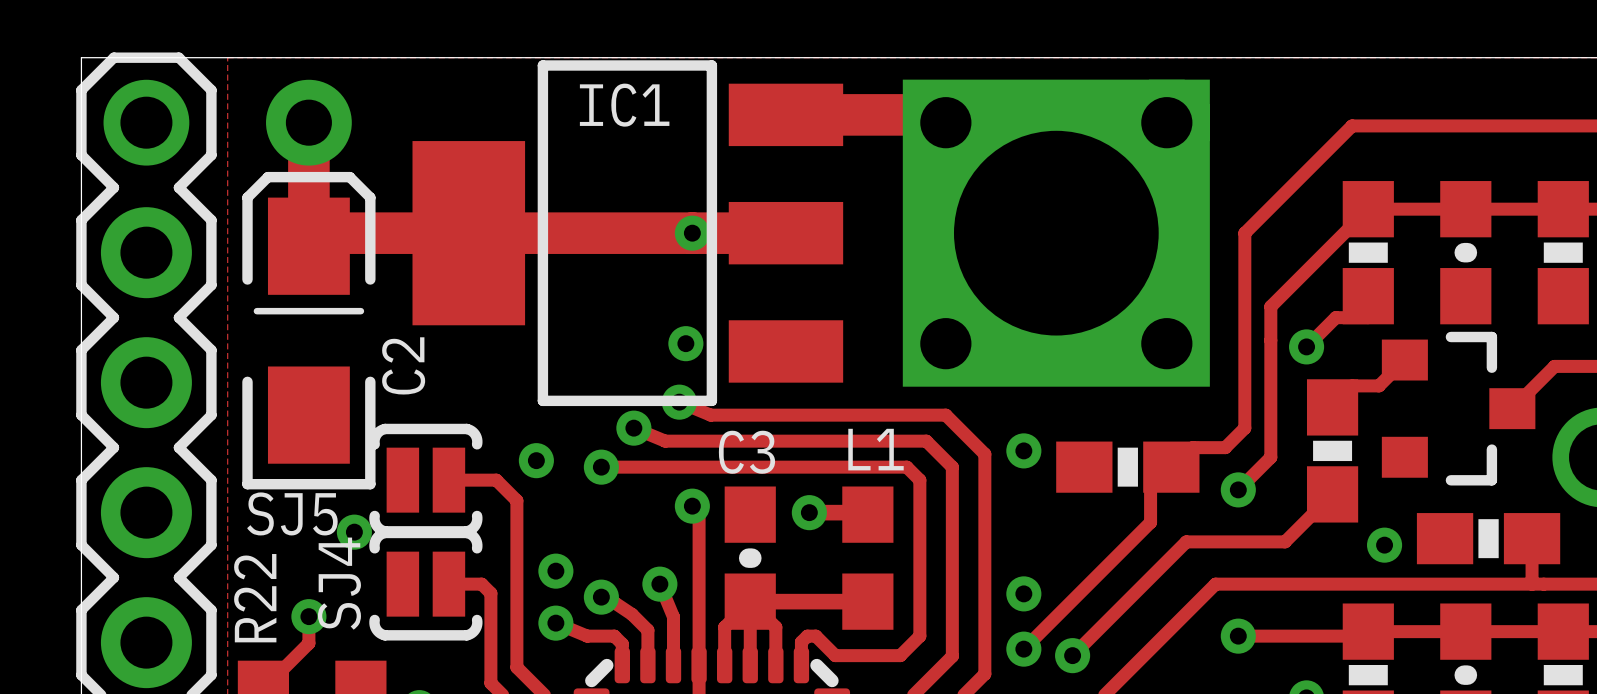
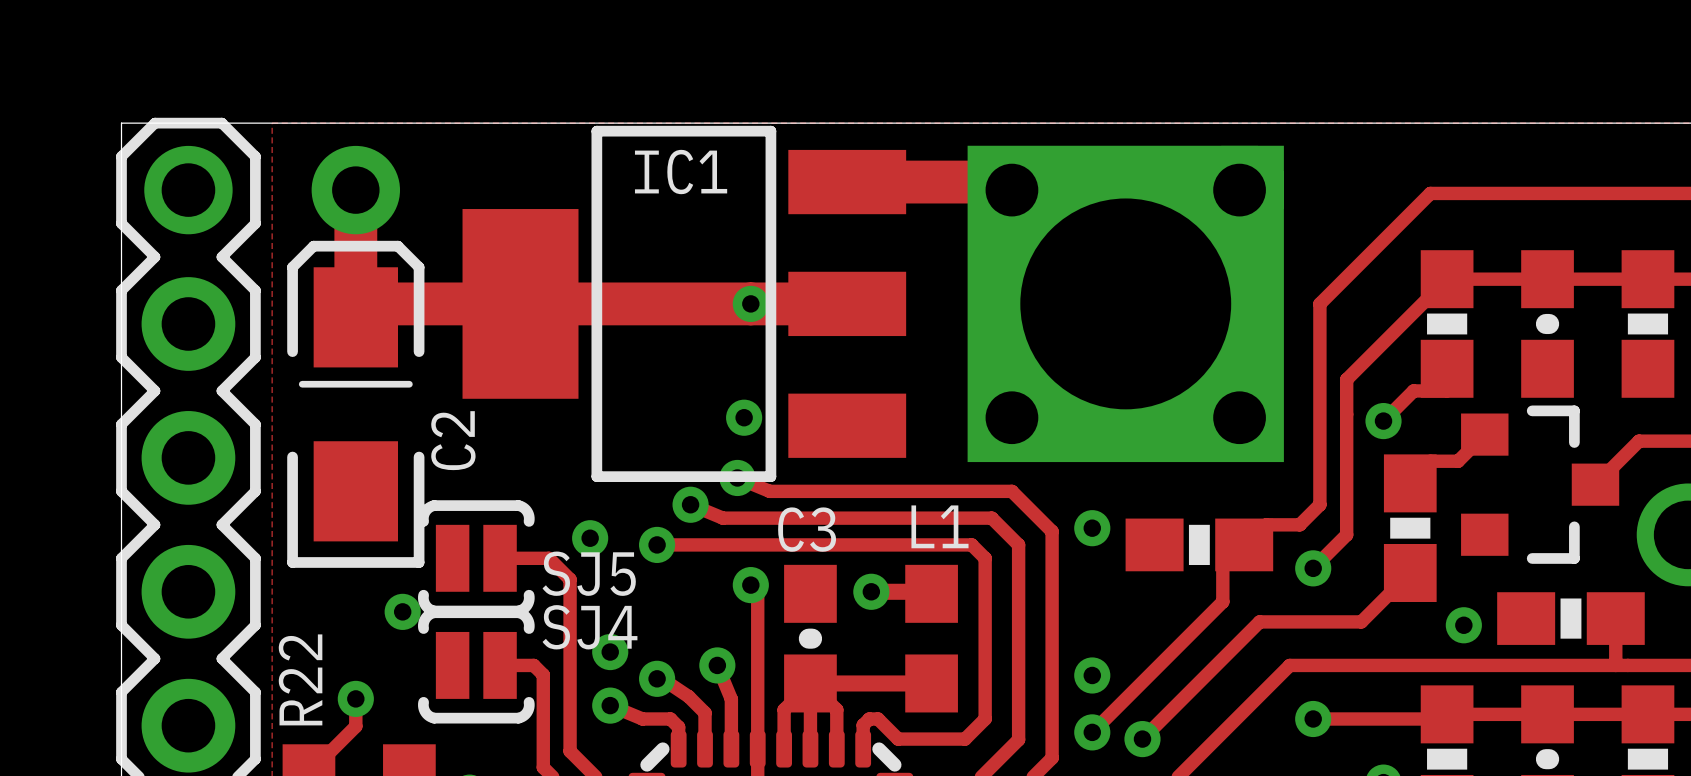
SJ5 name position: SJ5 (292, 513) -> SJ5 (589, 573)
SJ4 name rotation: 0° (339, 583) -> 90° clockwise (590, 627)
SJ4 name position: SJ4 (339, 583) -> SJ4 (590, 627)

